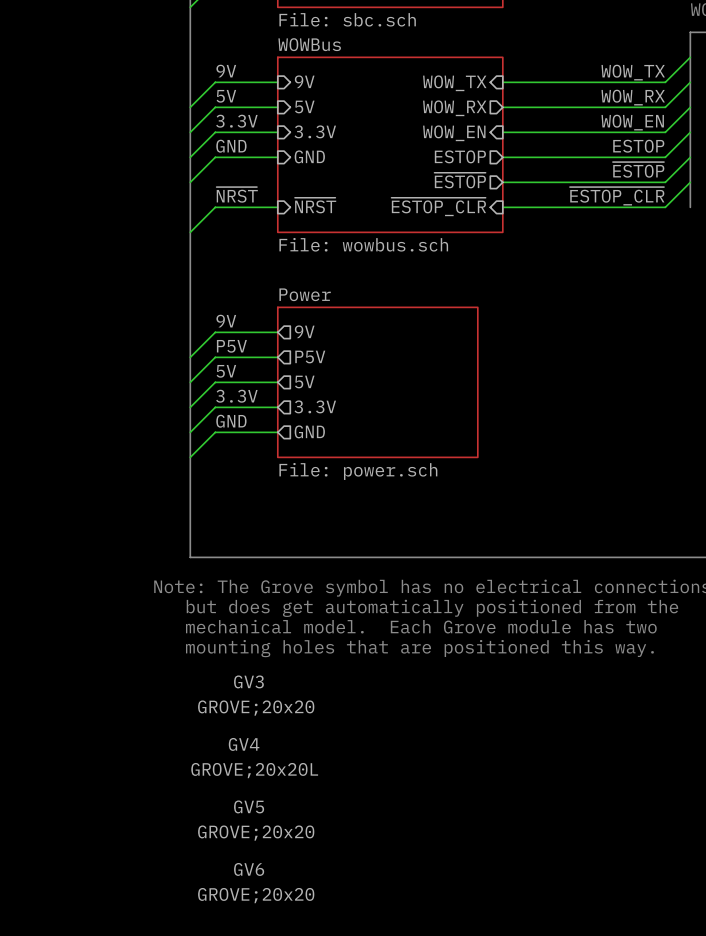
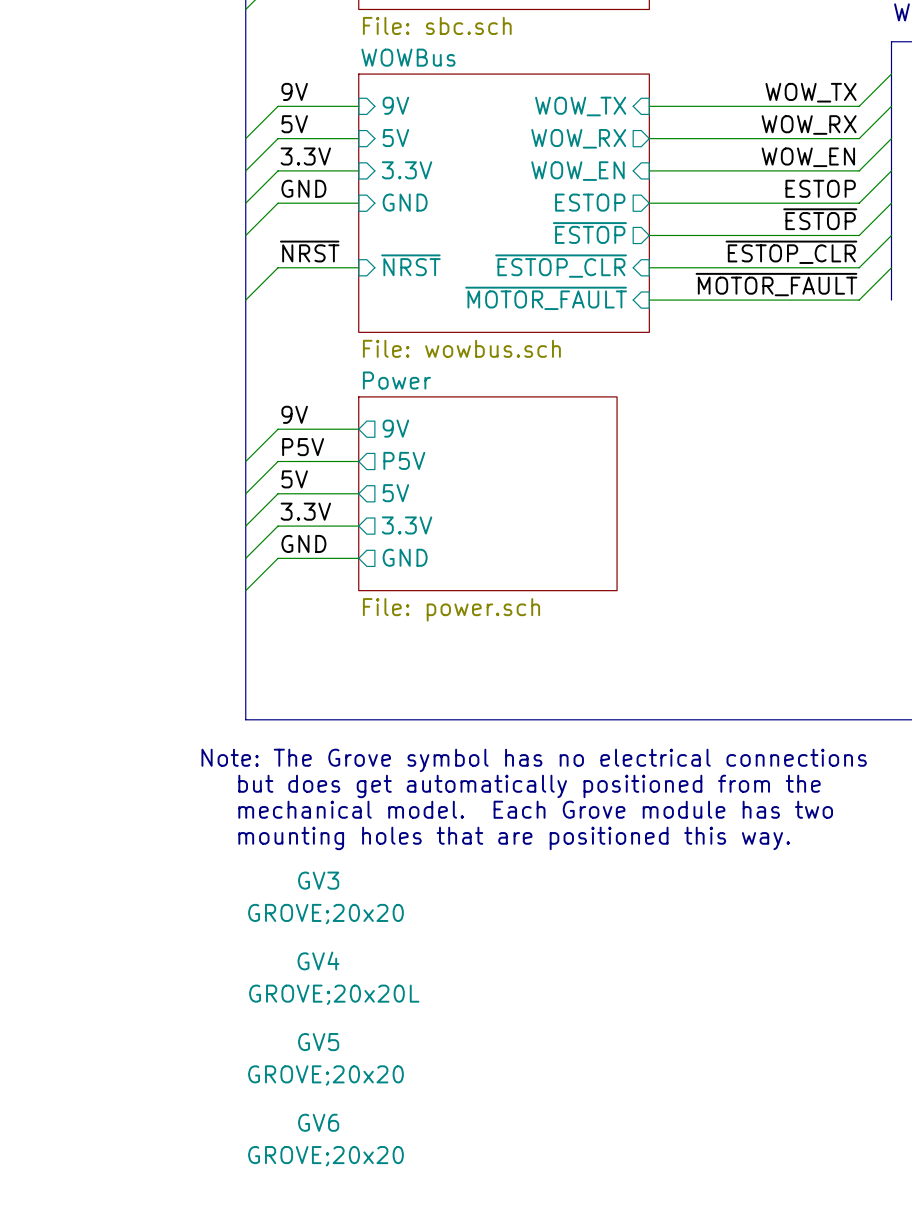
sheet WOWBus: File: wowbus.sch (390, 144) -> none
sheet WOWBus: none -> File: wowbus.sch (504, 203)
bus: none -> (891, 267) (891, 300)
wire: none -> (891, 267) (859, 300) (649, 300)
label: none -> ~{MOTOR_FAULT} (776, 284)
sheet pin: none -> ~{MOTOR_FAULT} (546, 298)

